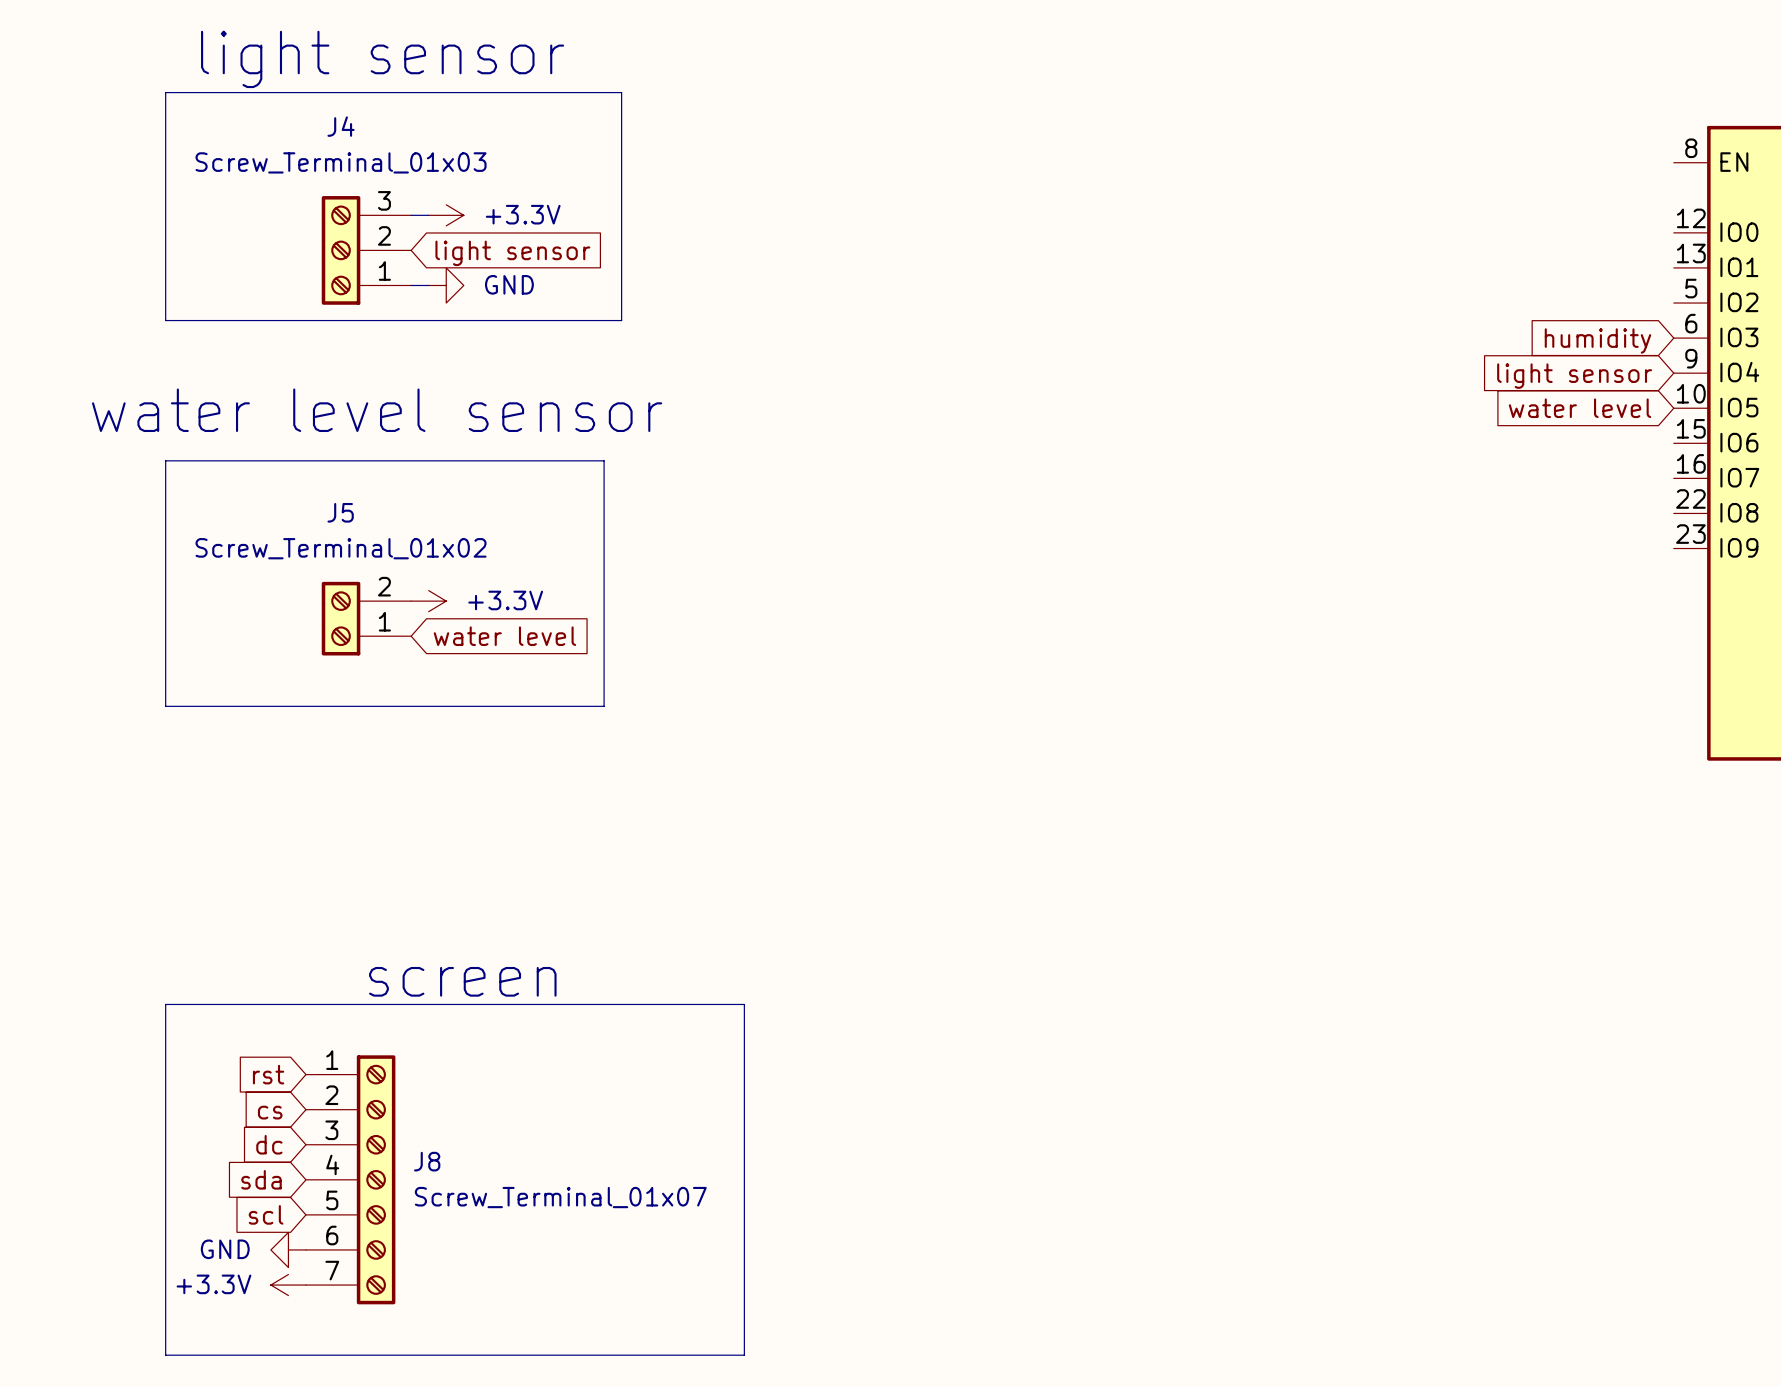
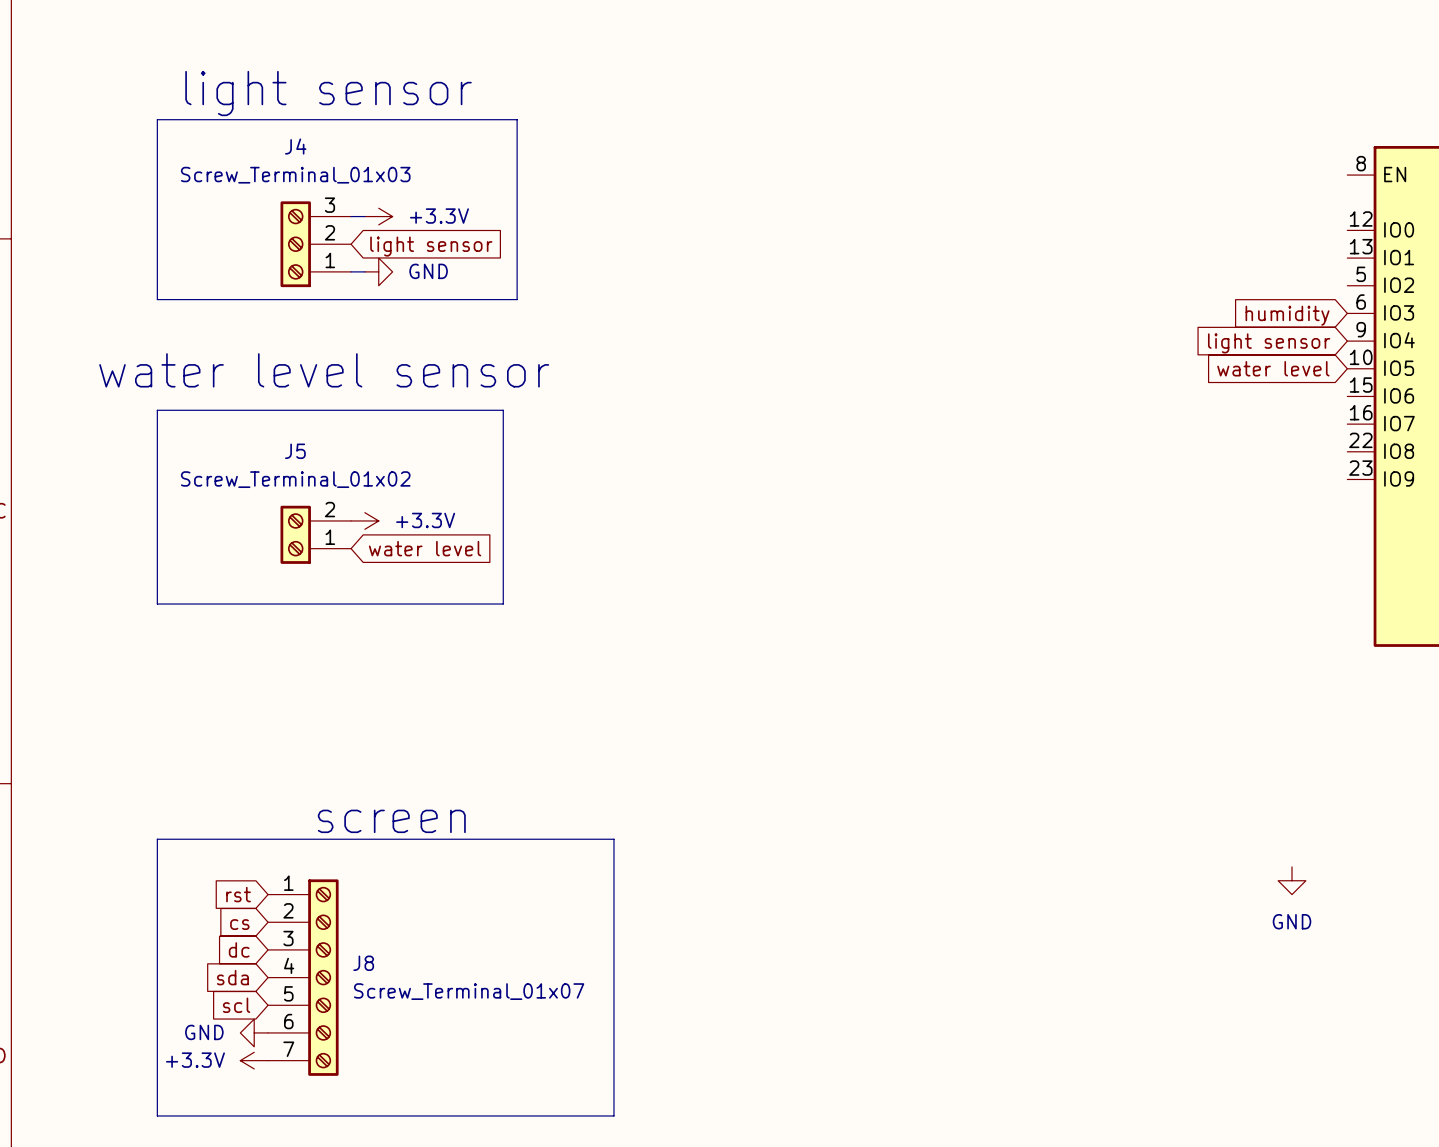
power symbol: none -> GND (1292, 880)

